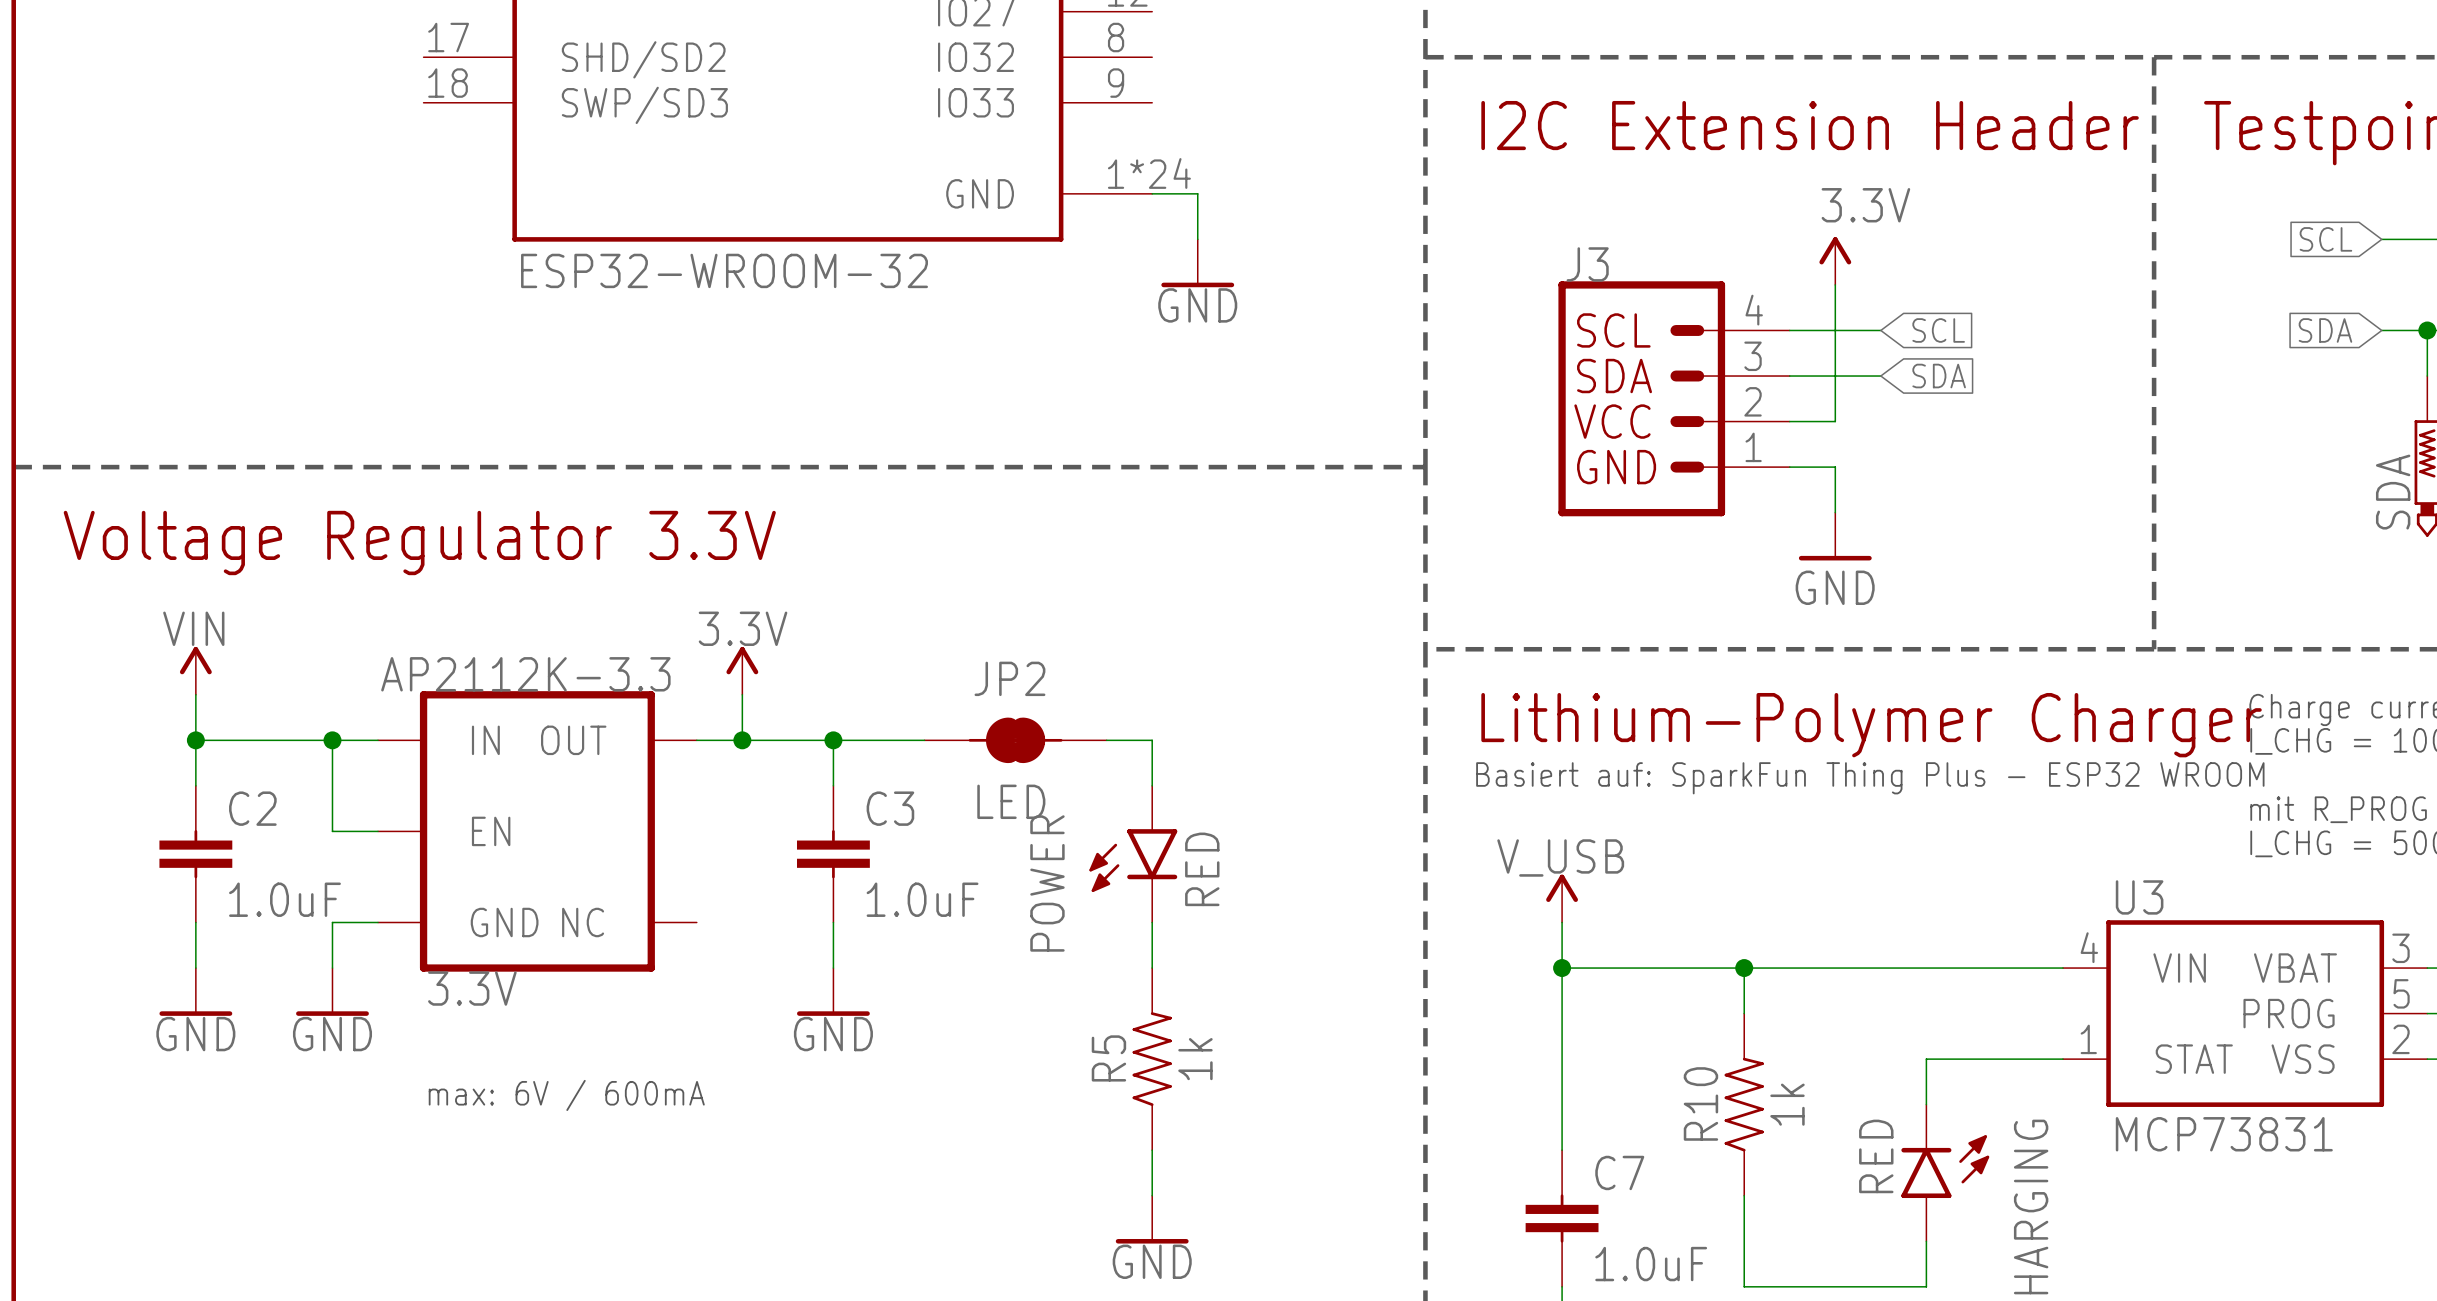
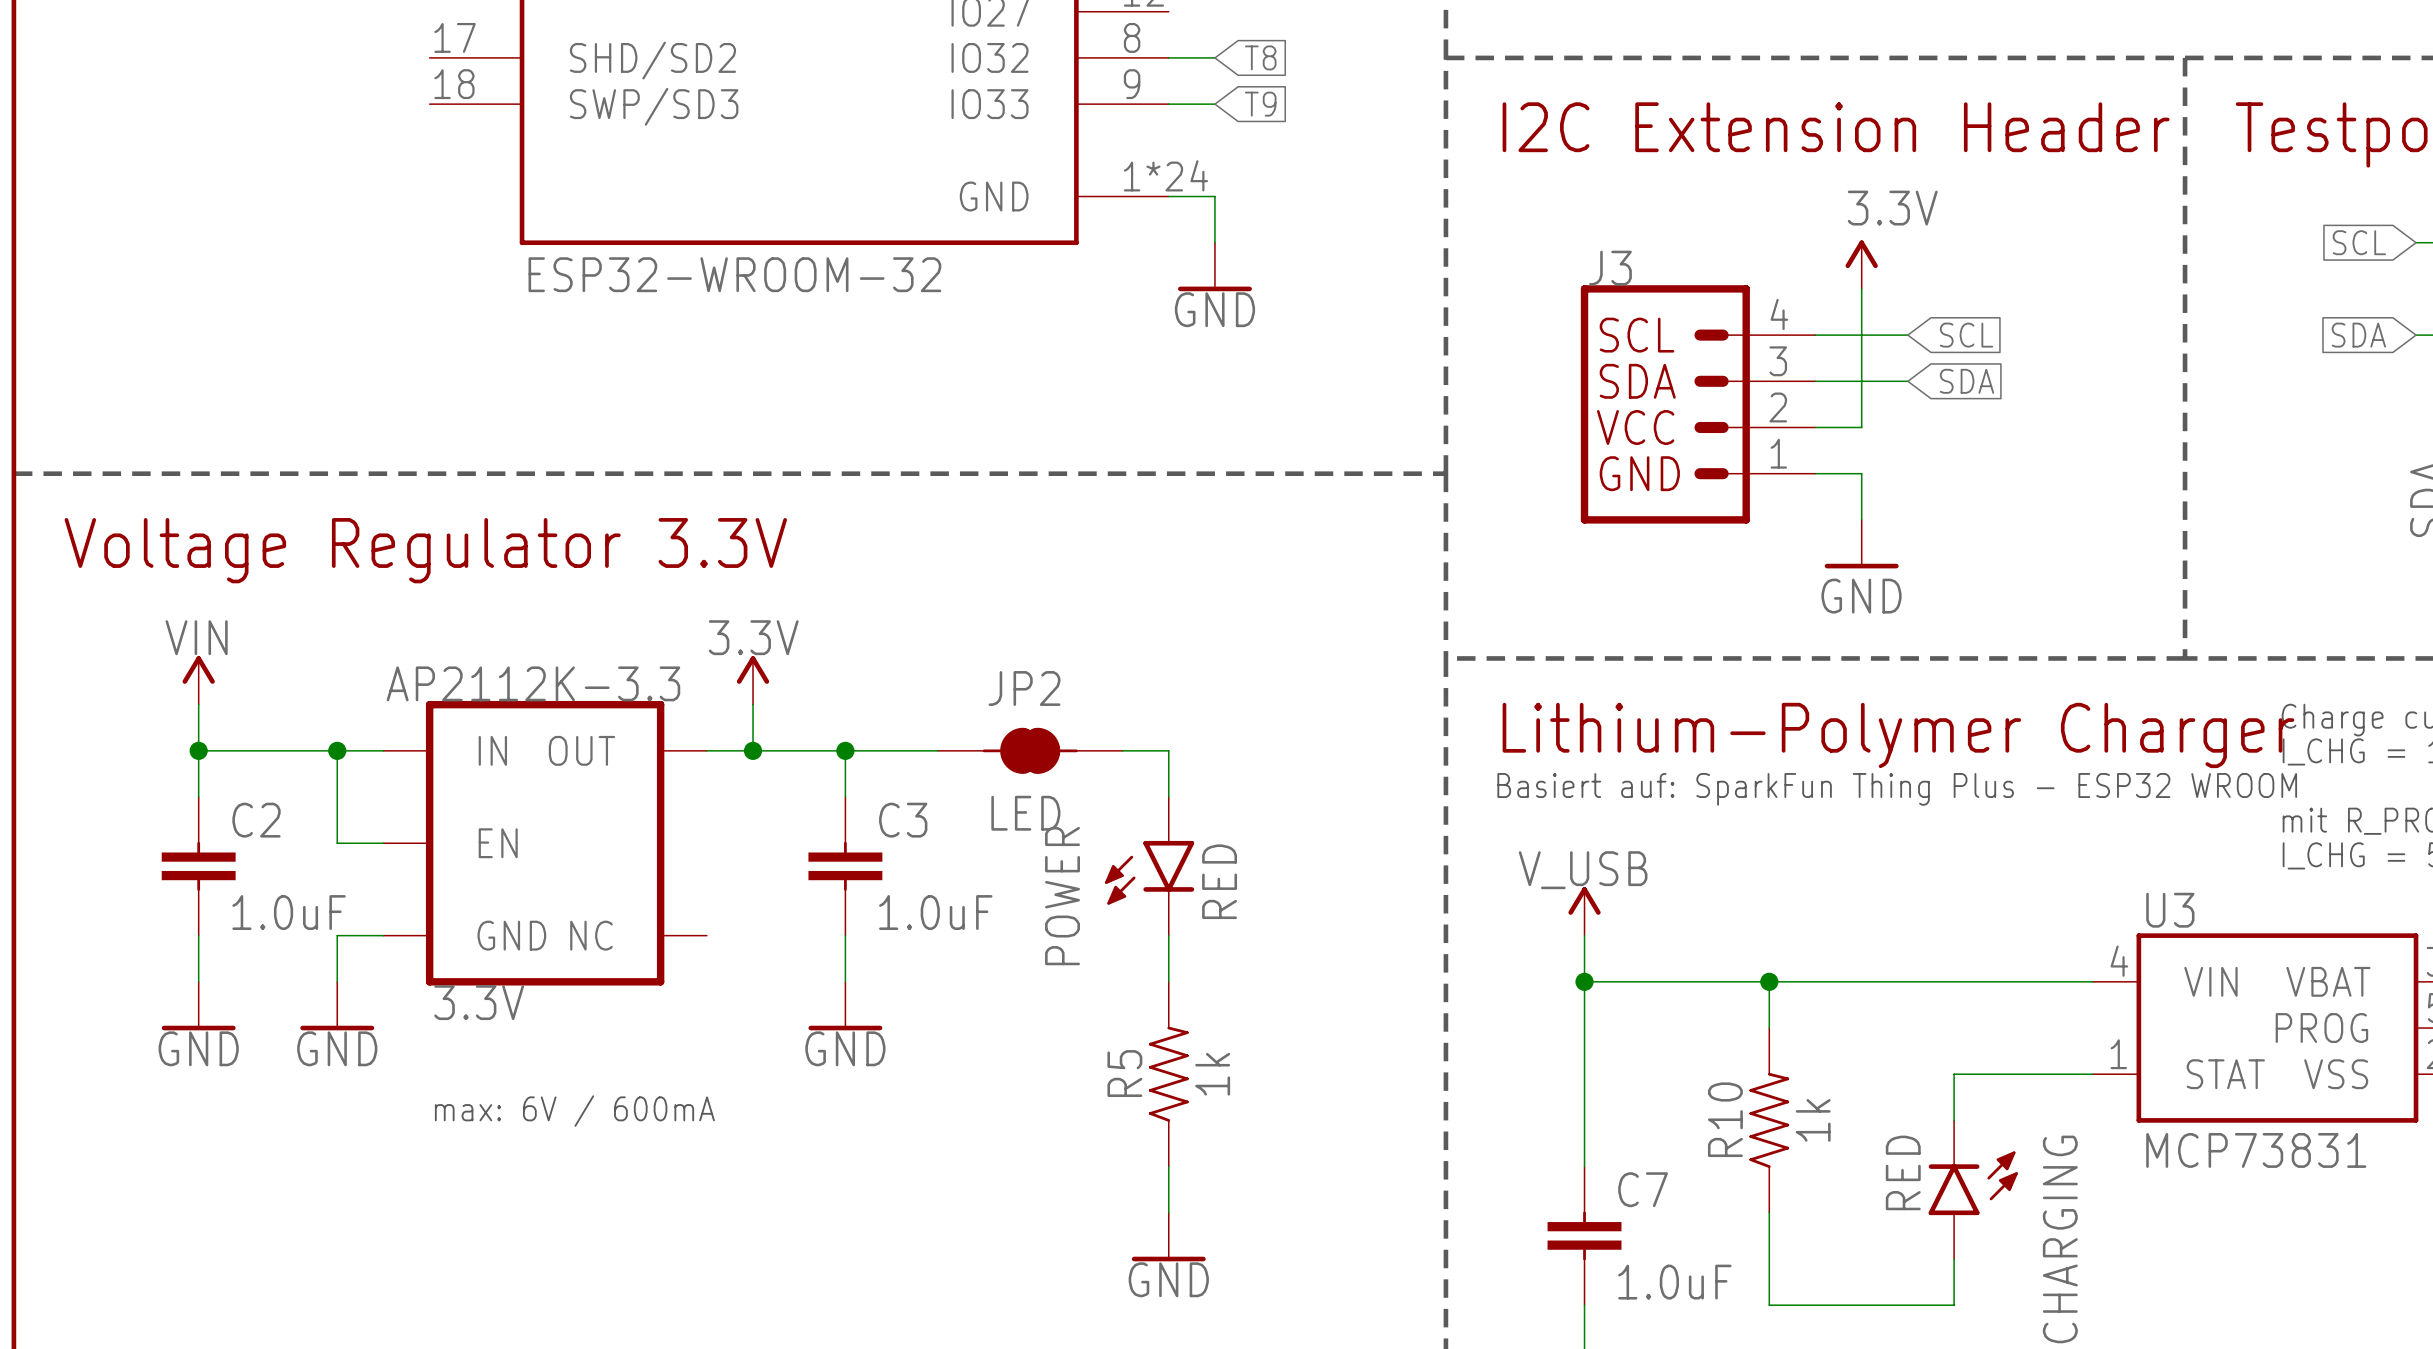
wire: none -> (1168, 57) (1214, 57)
global label: none -> T8 (1260, 57)
wire: none -> (1168, 104) (1214, 104)
global label: none -> T9 (1260, 104)

